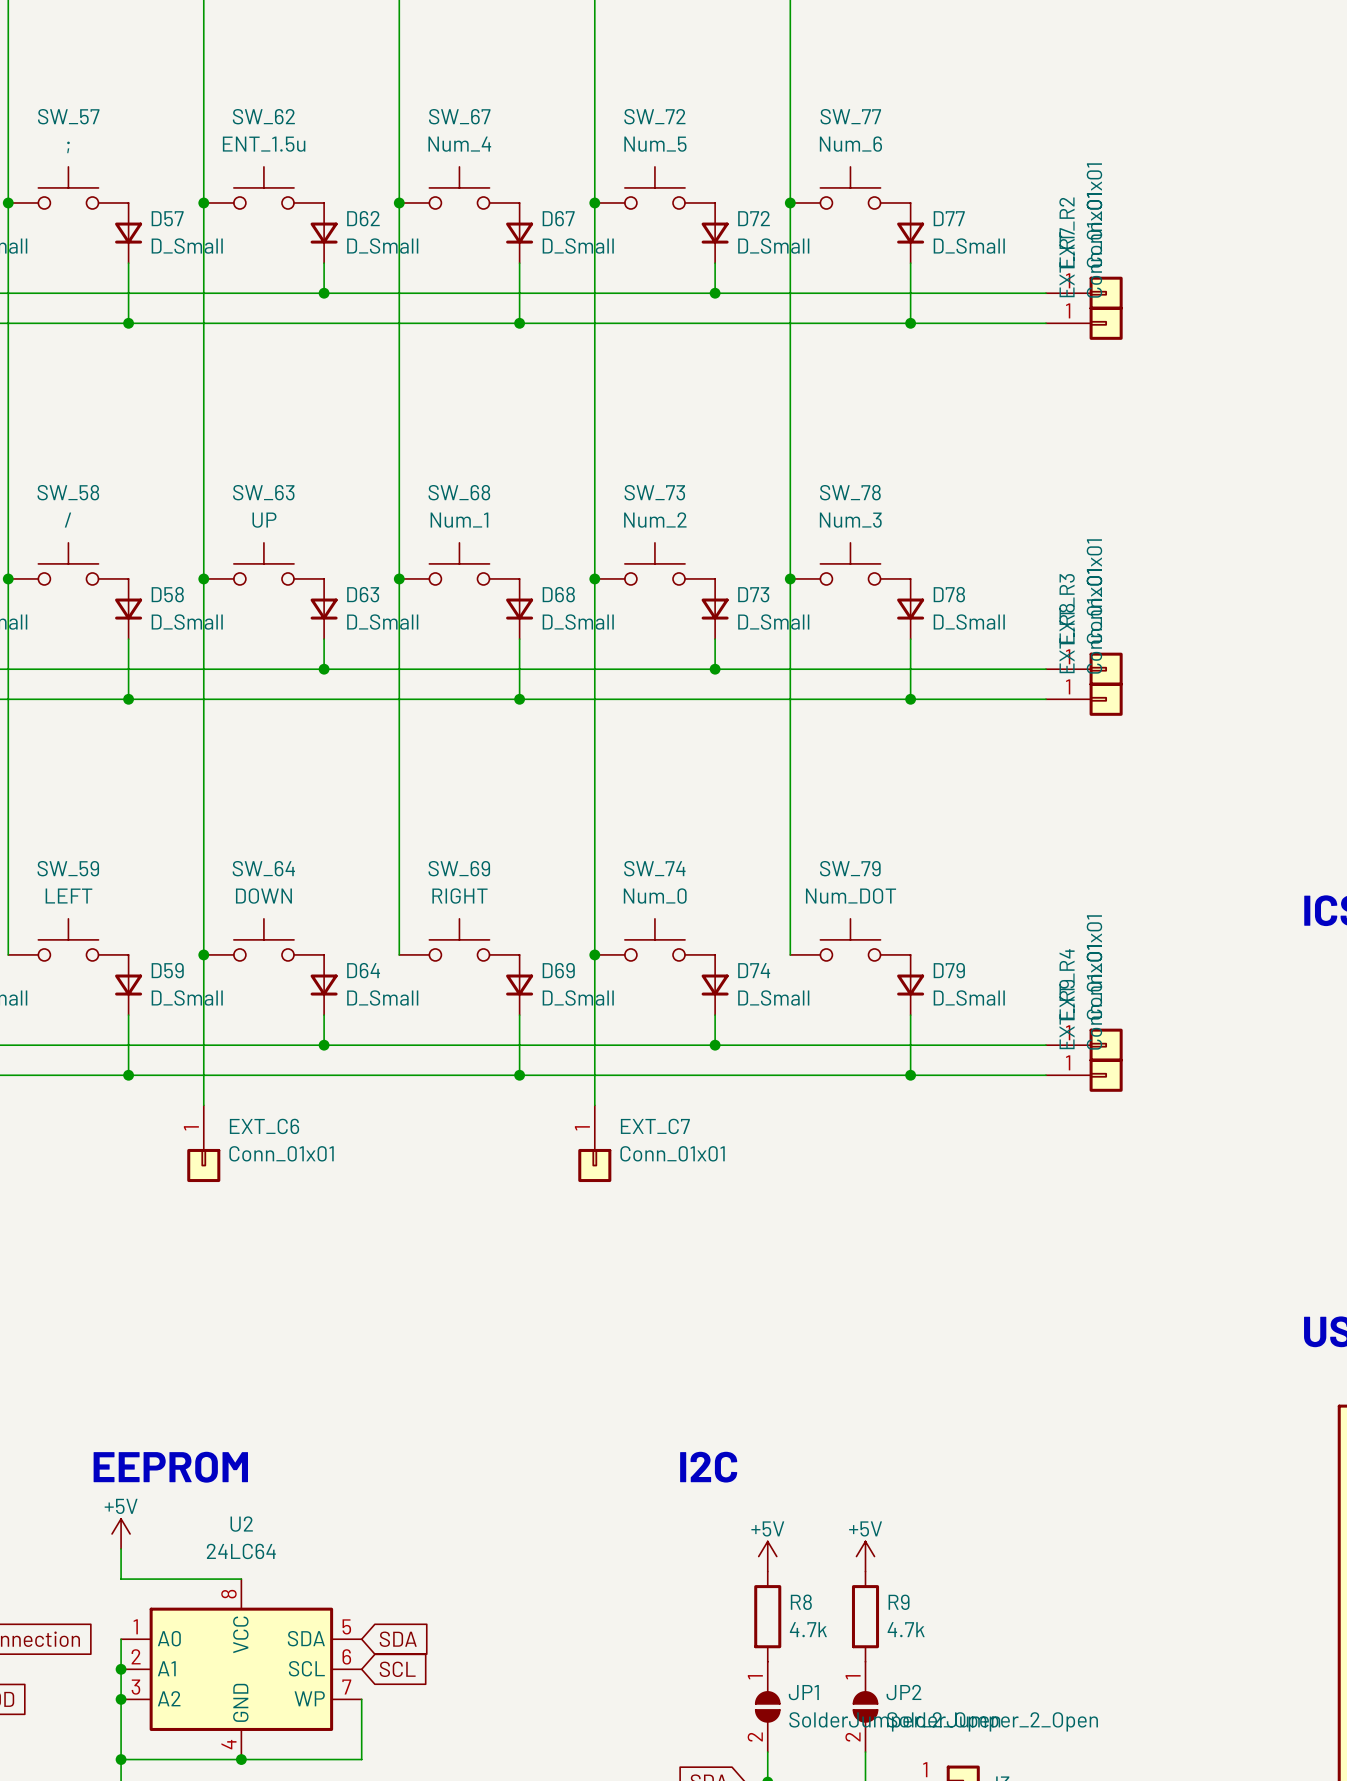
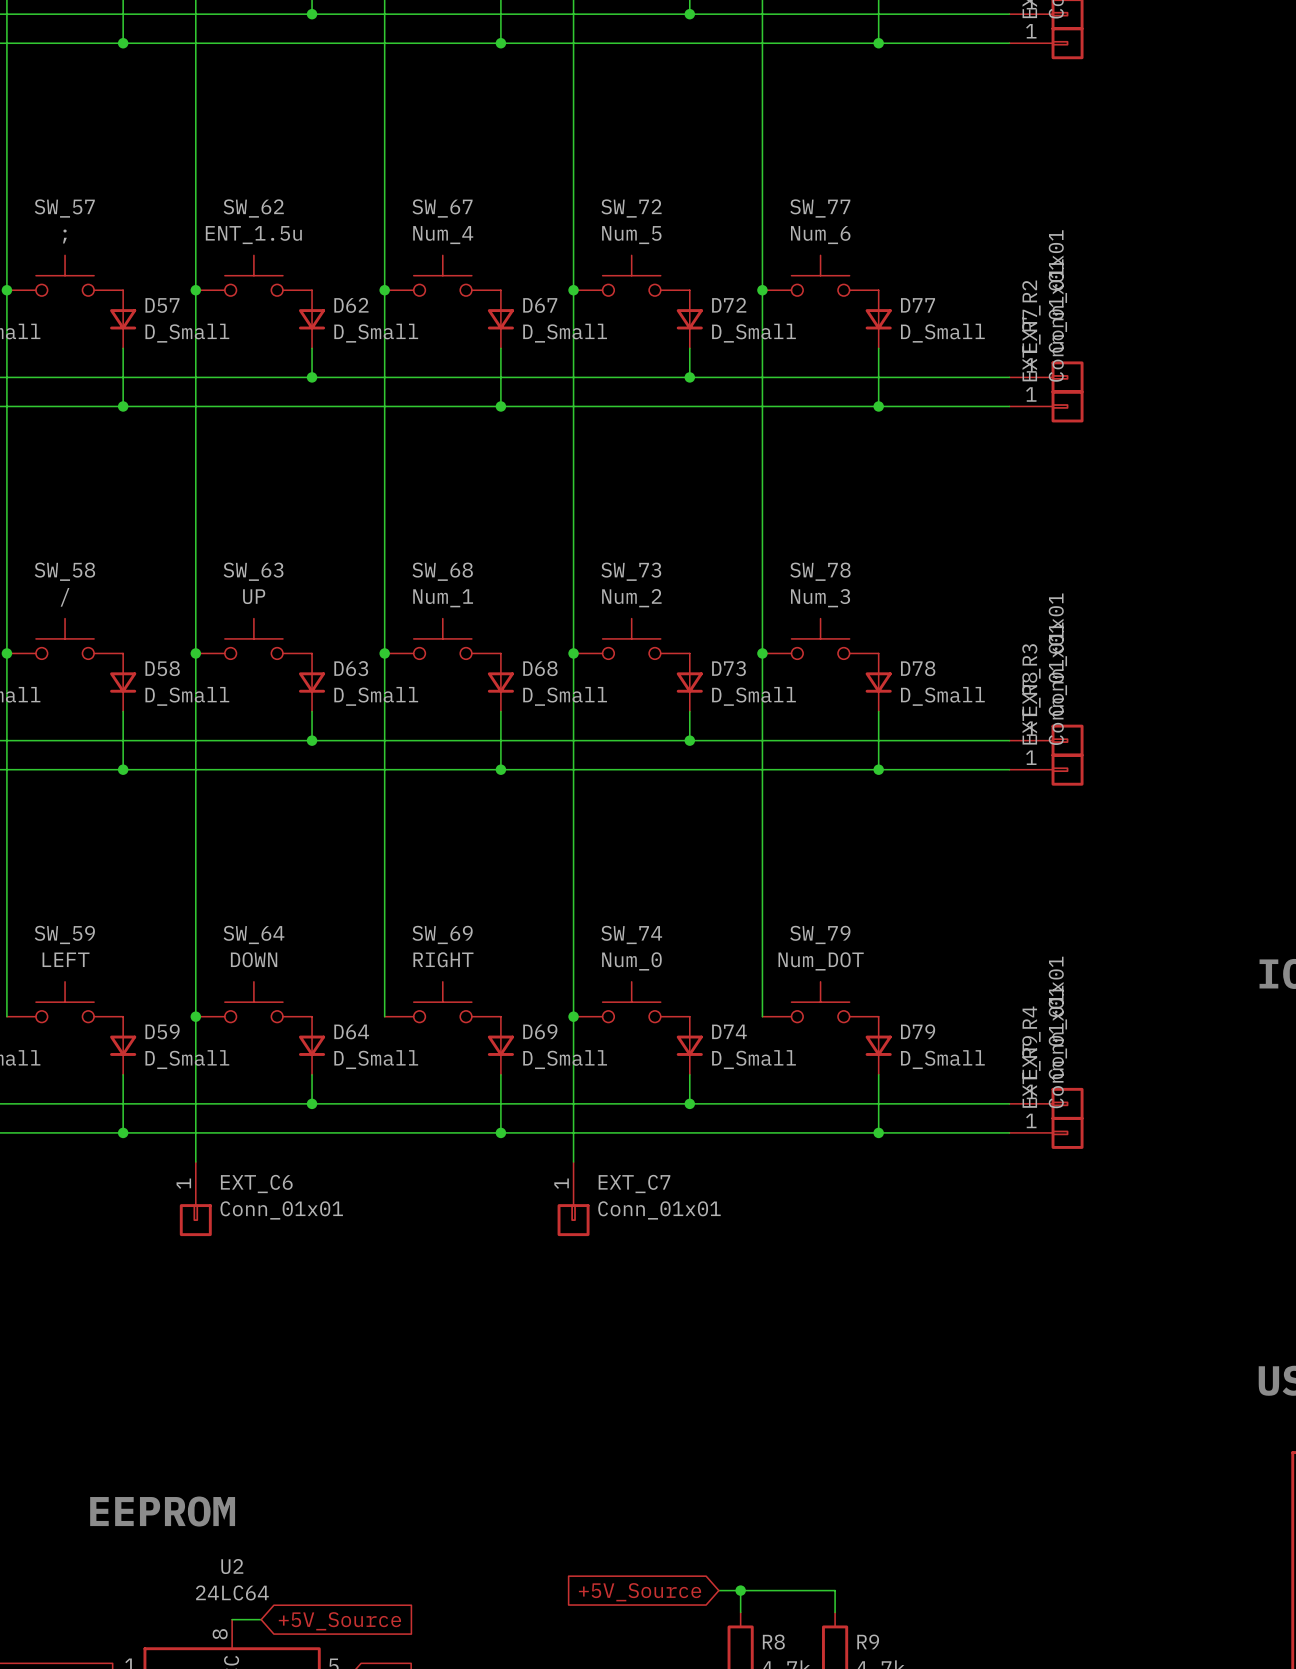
text: I2C (708, 1467) -> none
power symbol: +5V (121, 1533) -> none
wire: (121, 1548) (121, 1579) (241, 1579) -> (261, 1619) (232, 1619)
wire: none -> (718, 1590) (835, 1590) (835, 1612)
junction: none -> (740, 1590)
global label: none -> +5V_Source (640, 1592)
power symbol: +5V (767, 1556) -> none
power symbol: +5V (865, 1556) -> none
global label: none -> +5V_Source (339, 1621)

